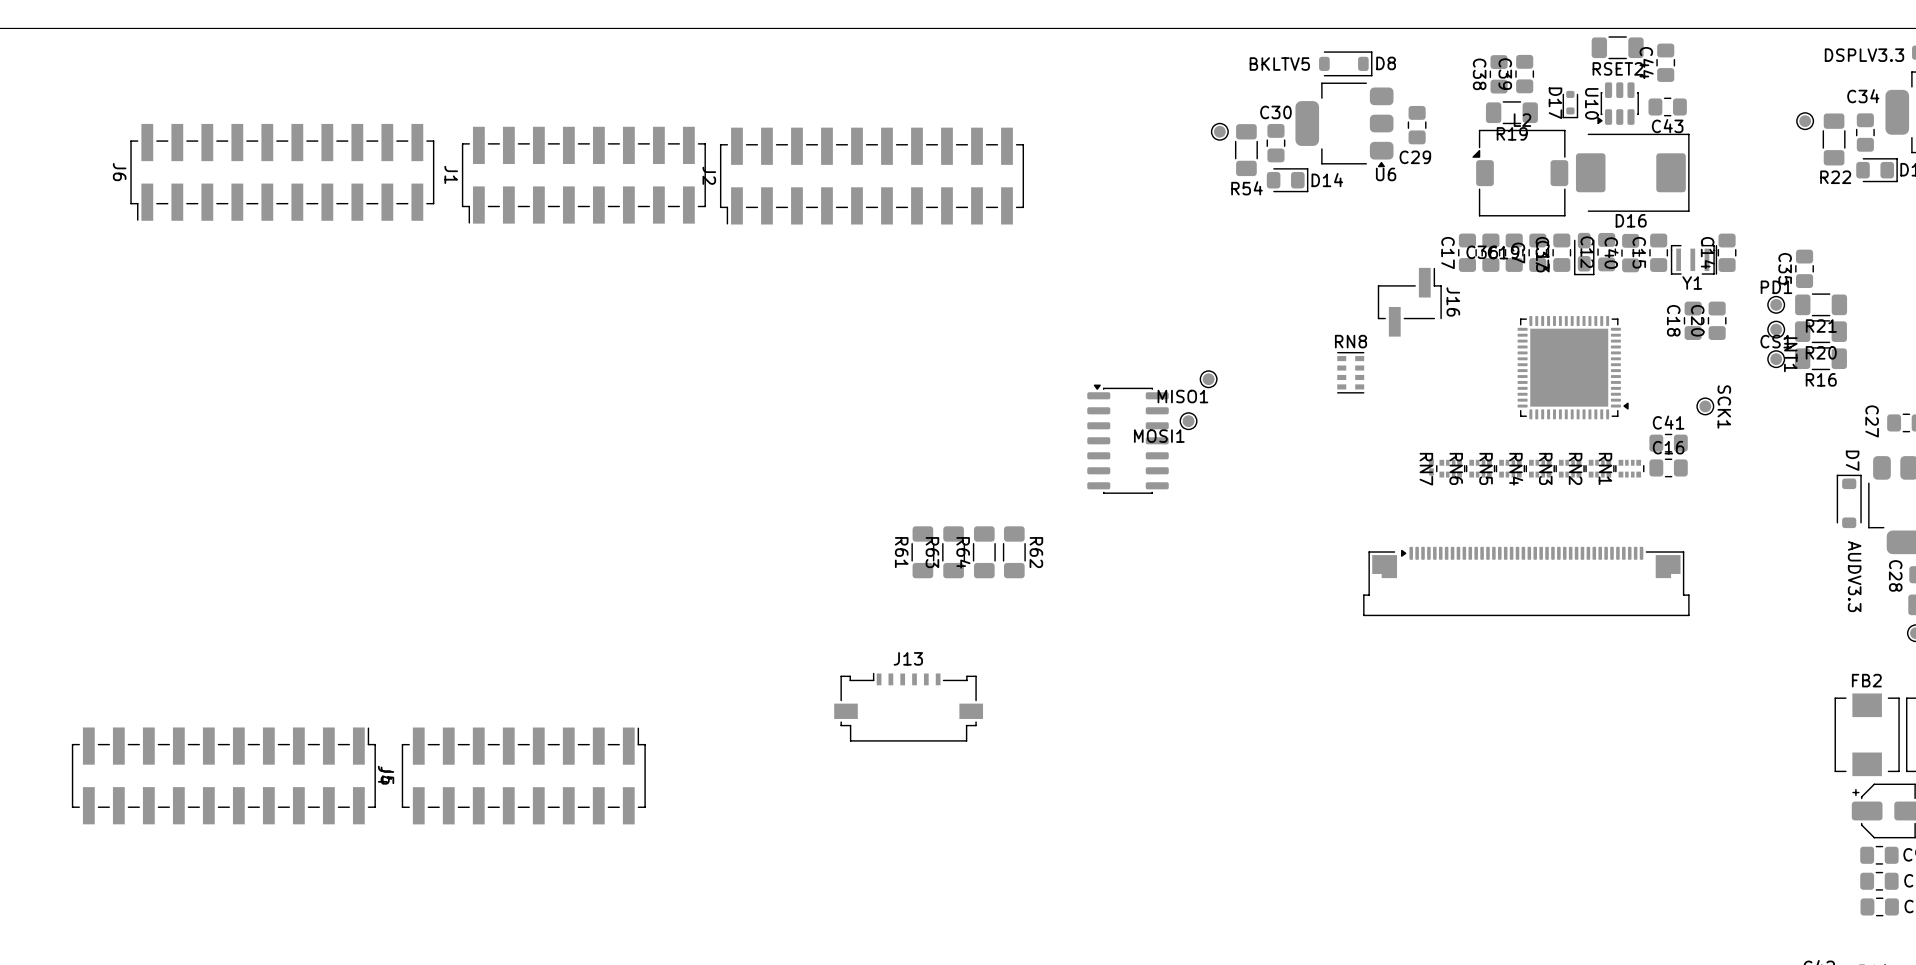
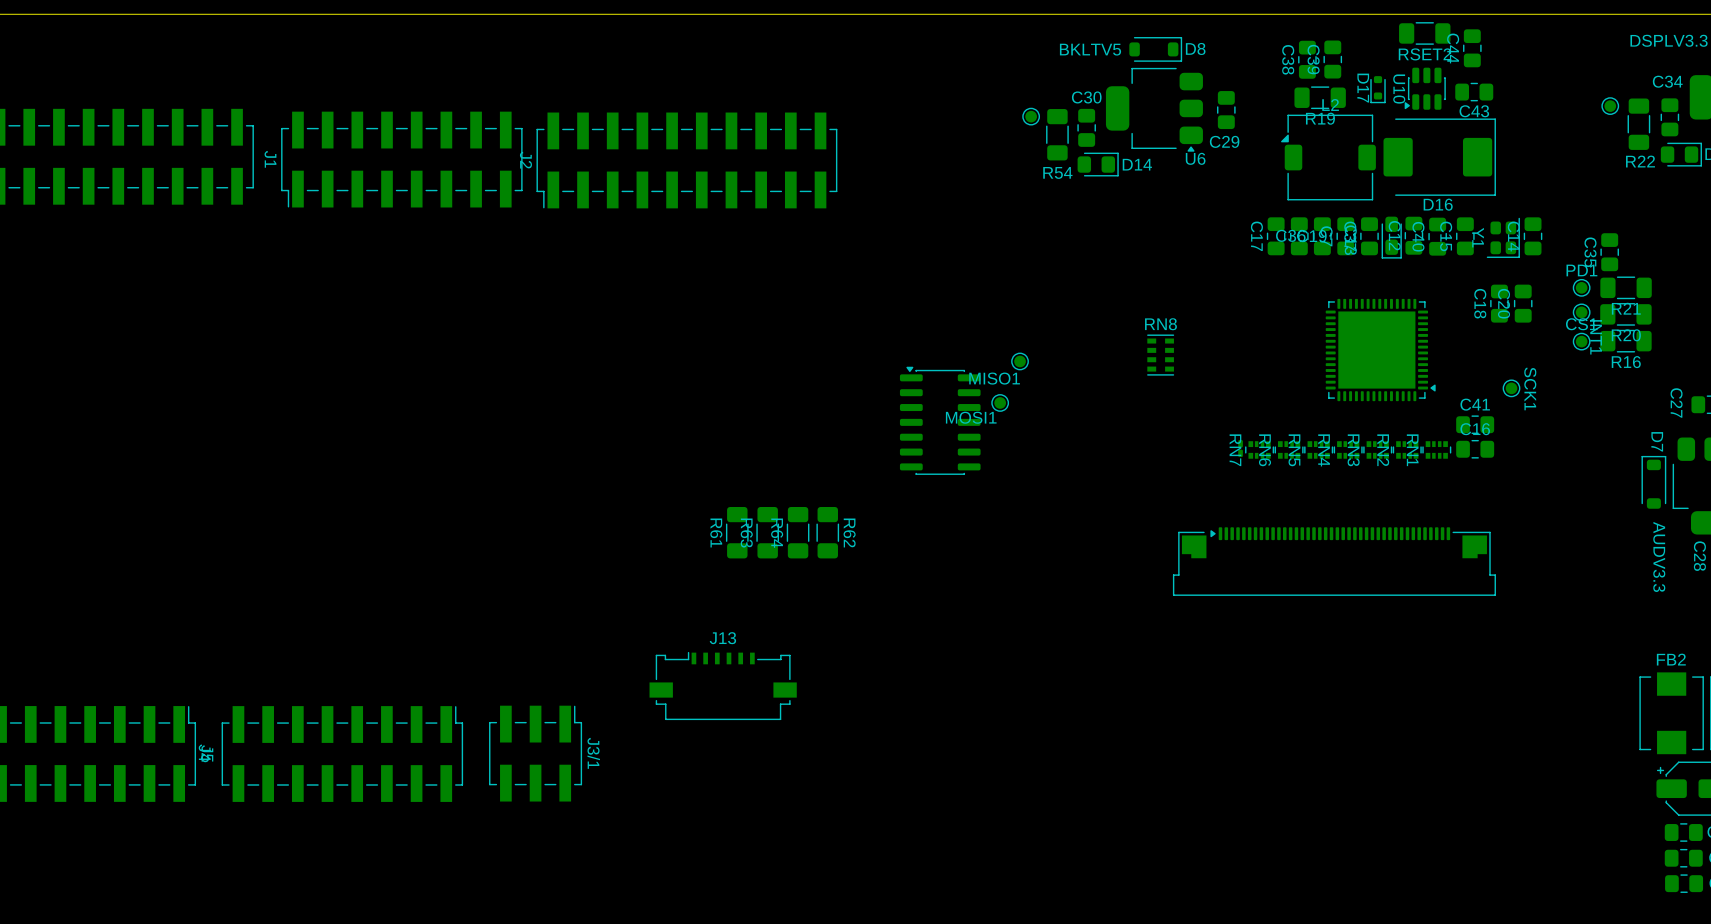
Y1 footprint: [1670, 240, 1718, 275] -> [1486, 217, 1520, 258]
Y1 name position: Y1 (1692, 283) -> Y1 (1478, 237)
J16: (1409, 302) -> none
J3/1: none -> (535, 753)

